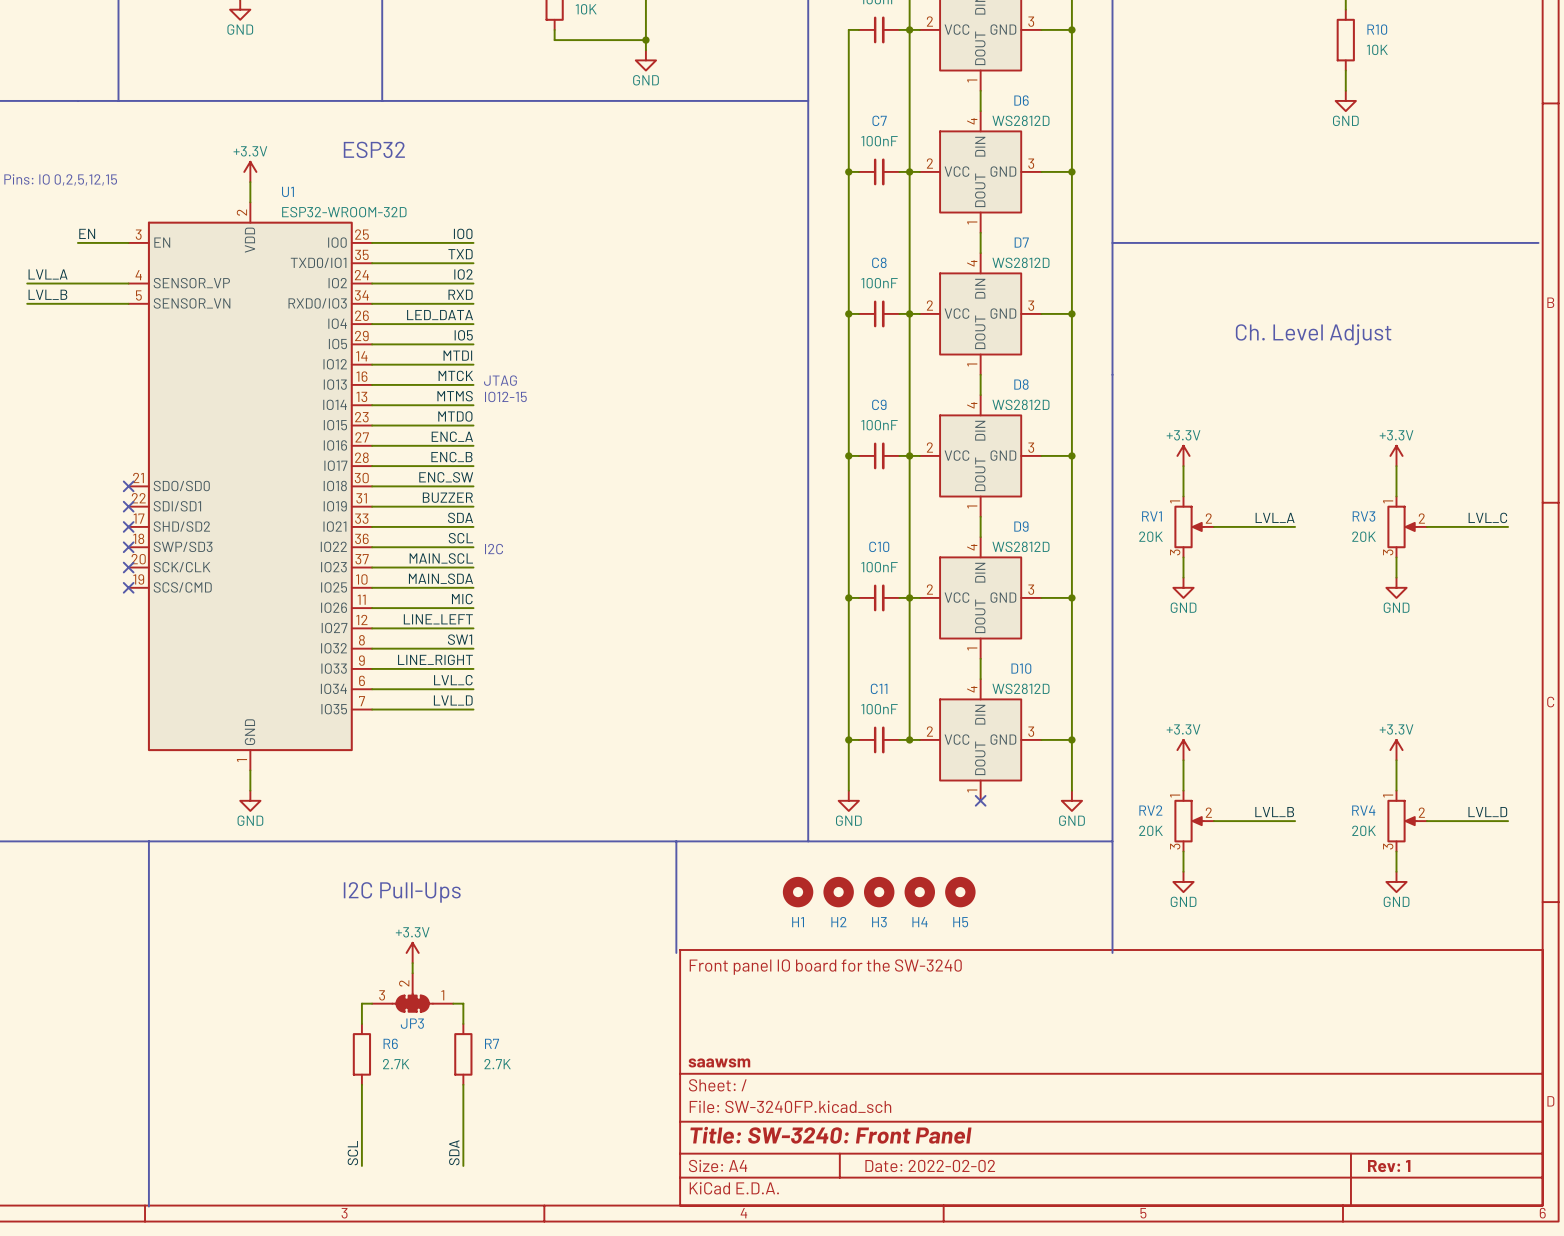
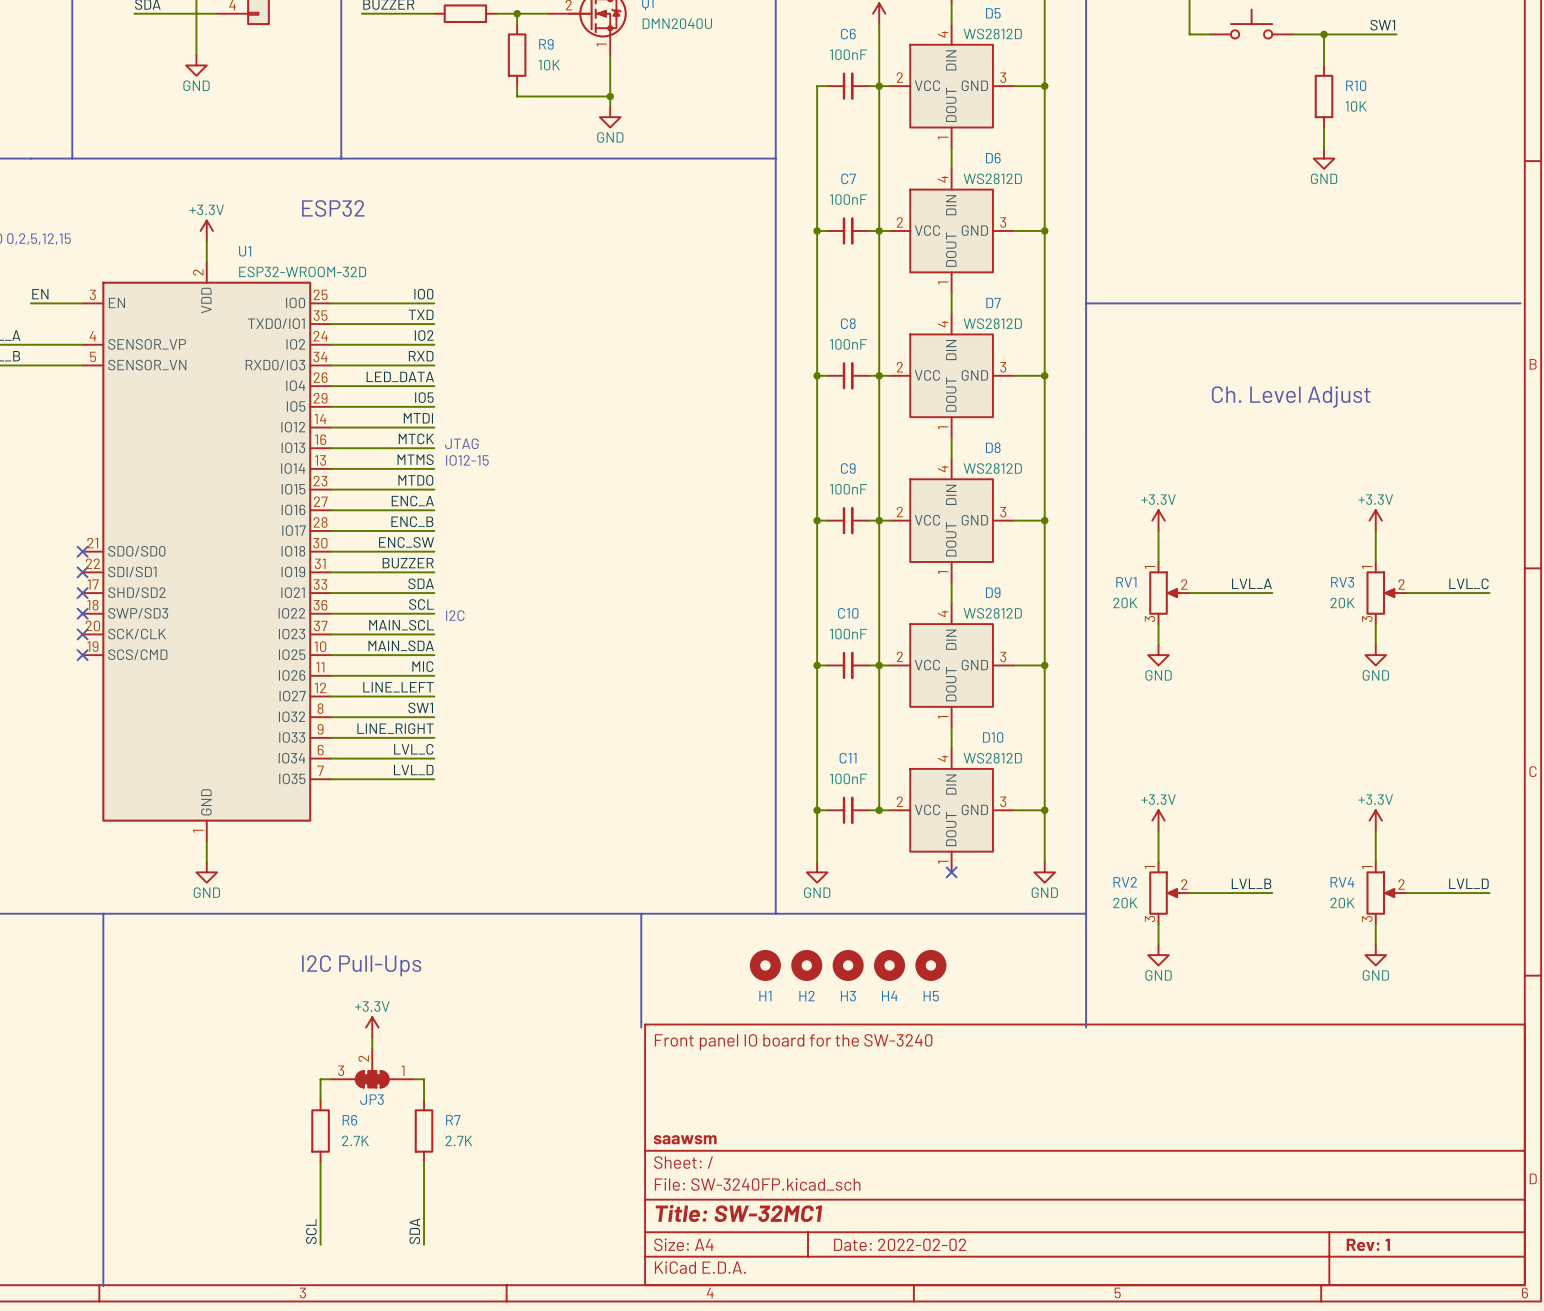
title block: Title: SW-3240: Front Panel (830, 1135) -> Title: SW-32MC1 (738, 1213)

